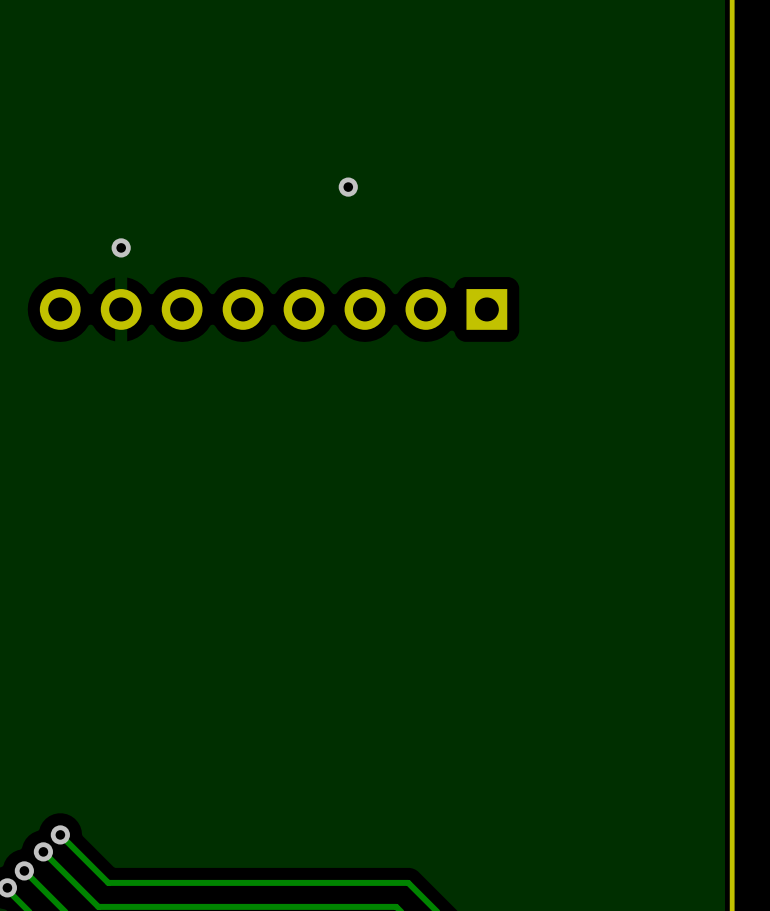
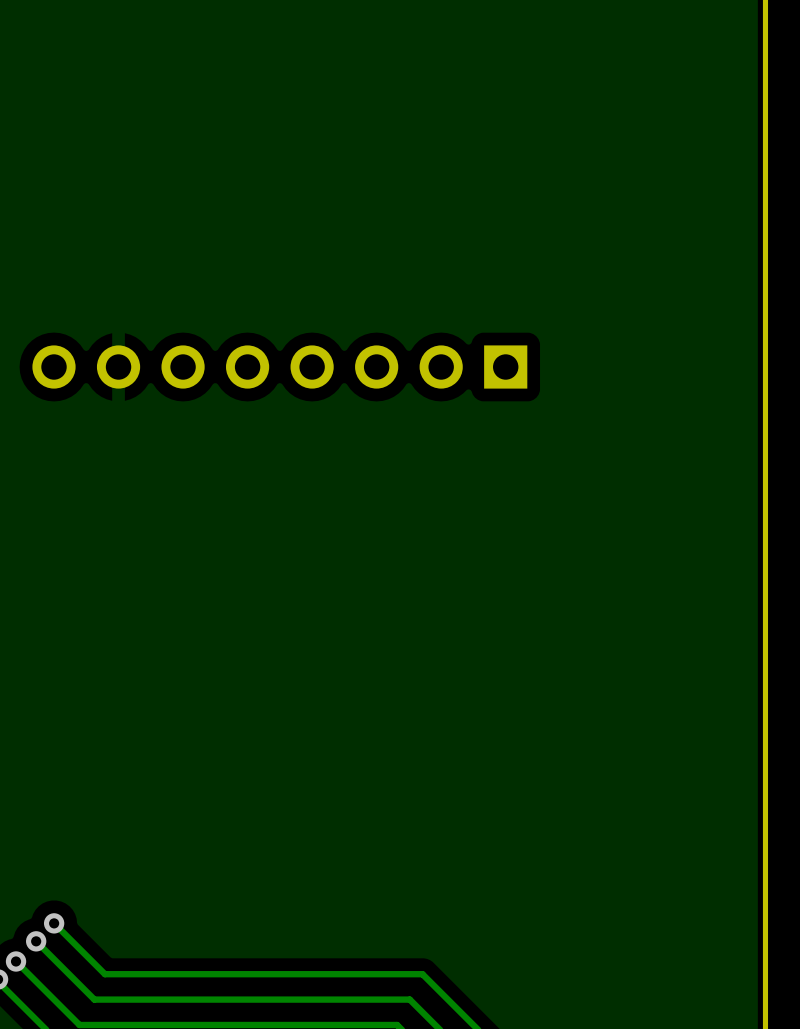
via: (348, 187) -> none
via: (121, 247) -> none

